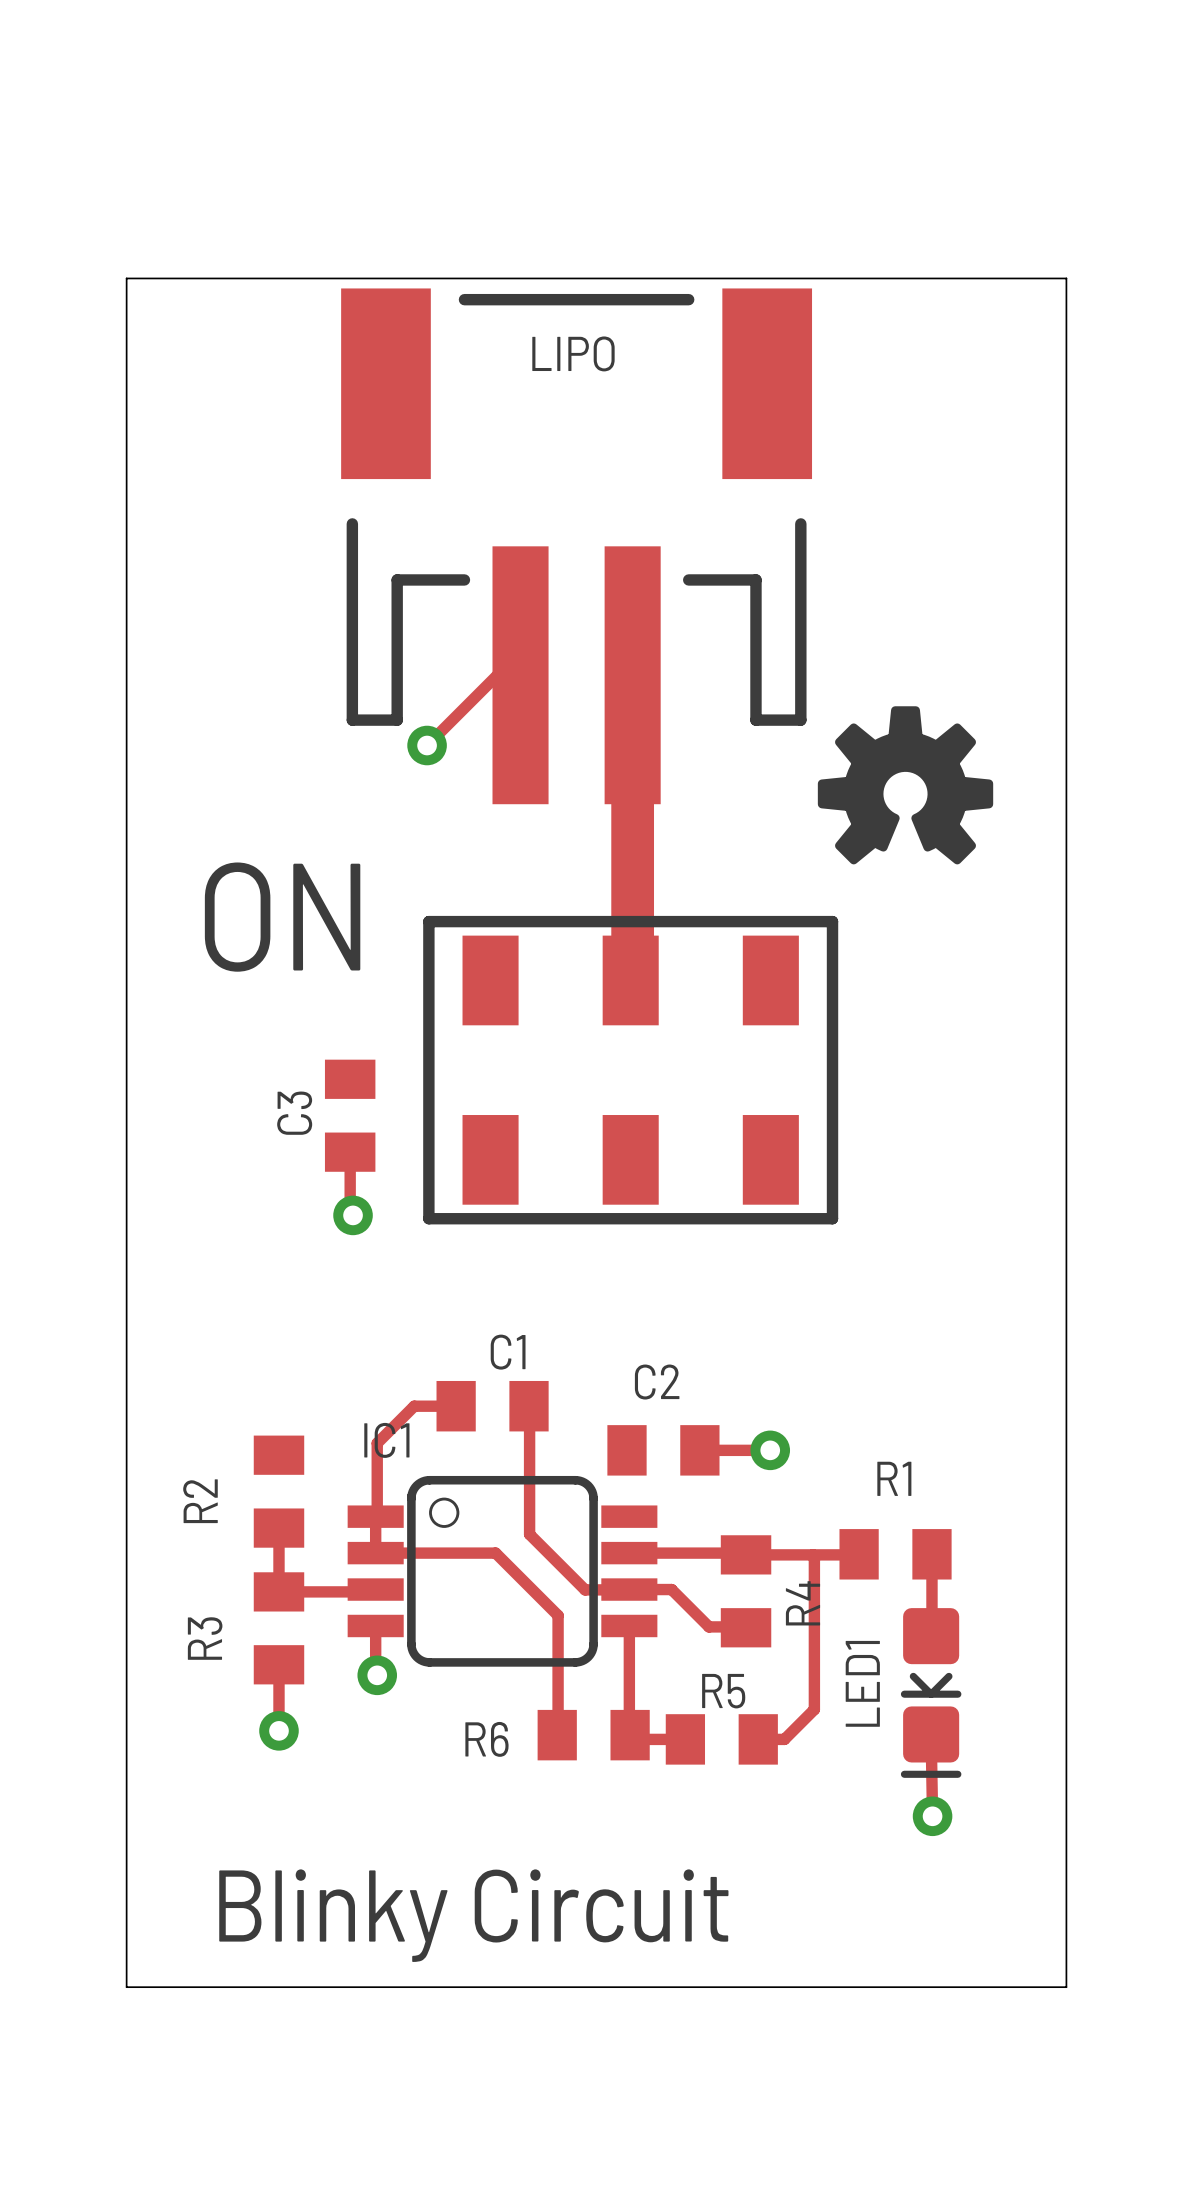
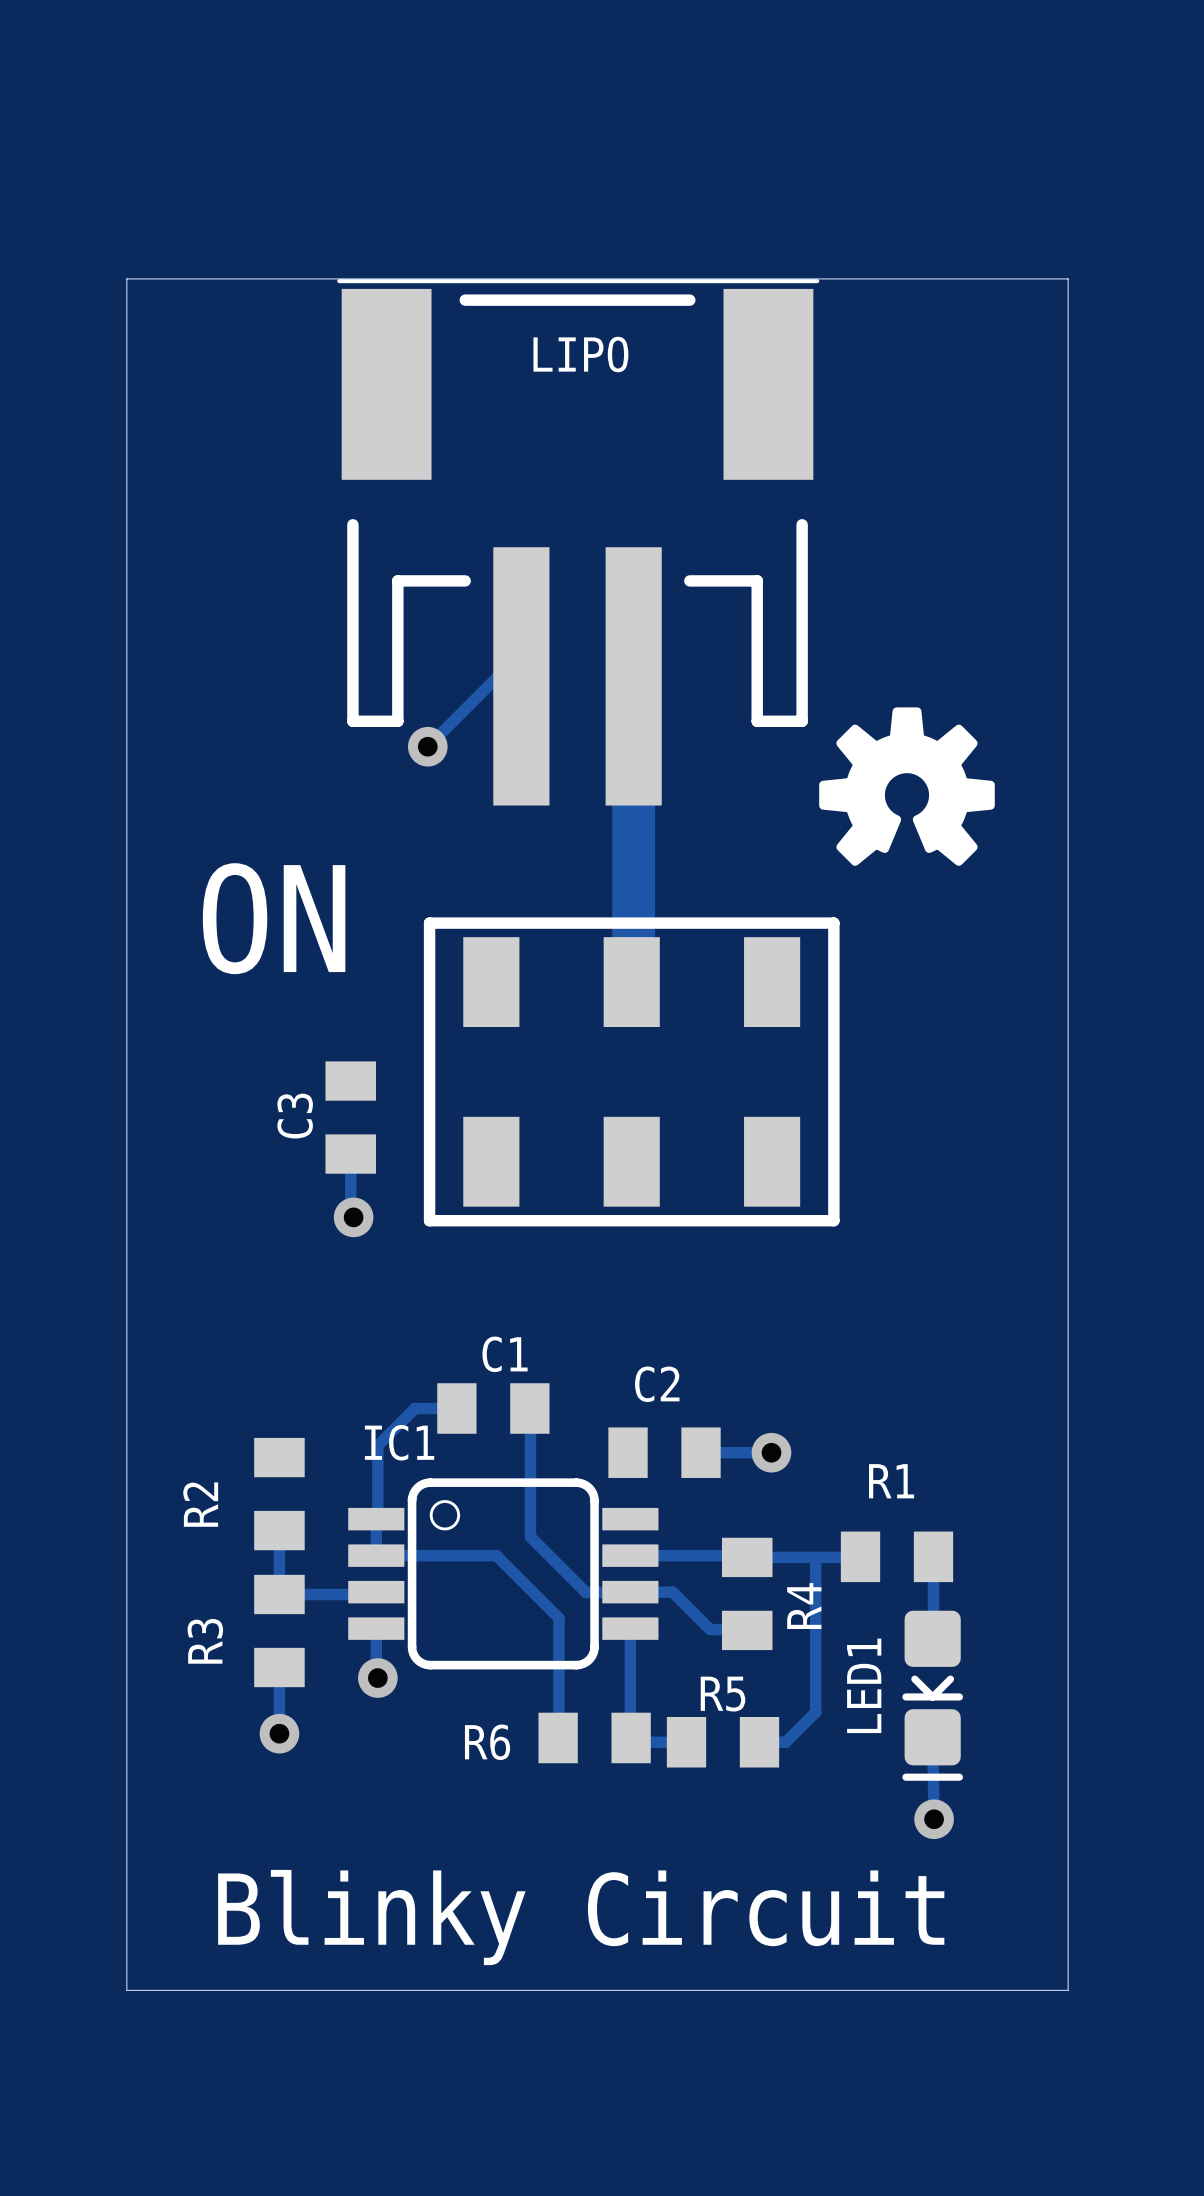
LIPO footprint: [341, 288, 813, 805] -> [337, 278, 820, 806]

